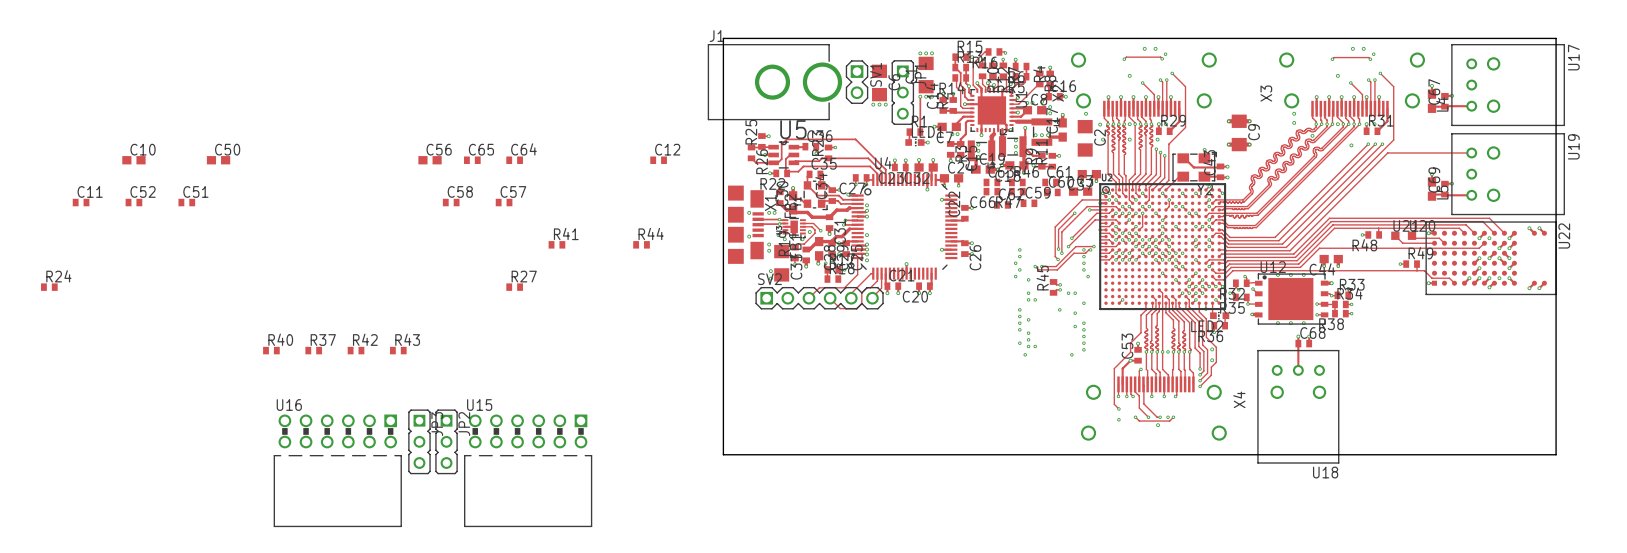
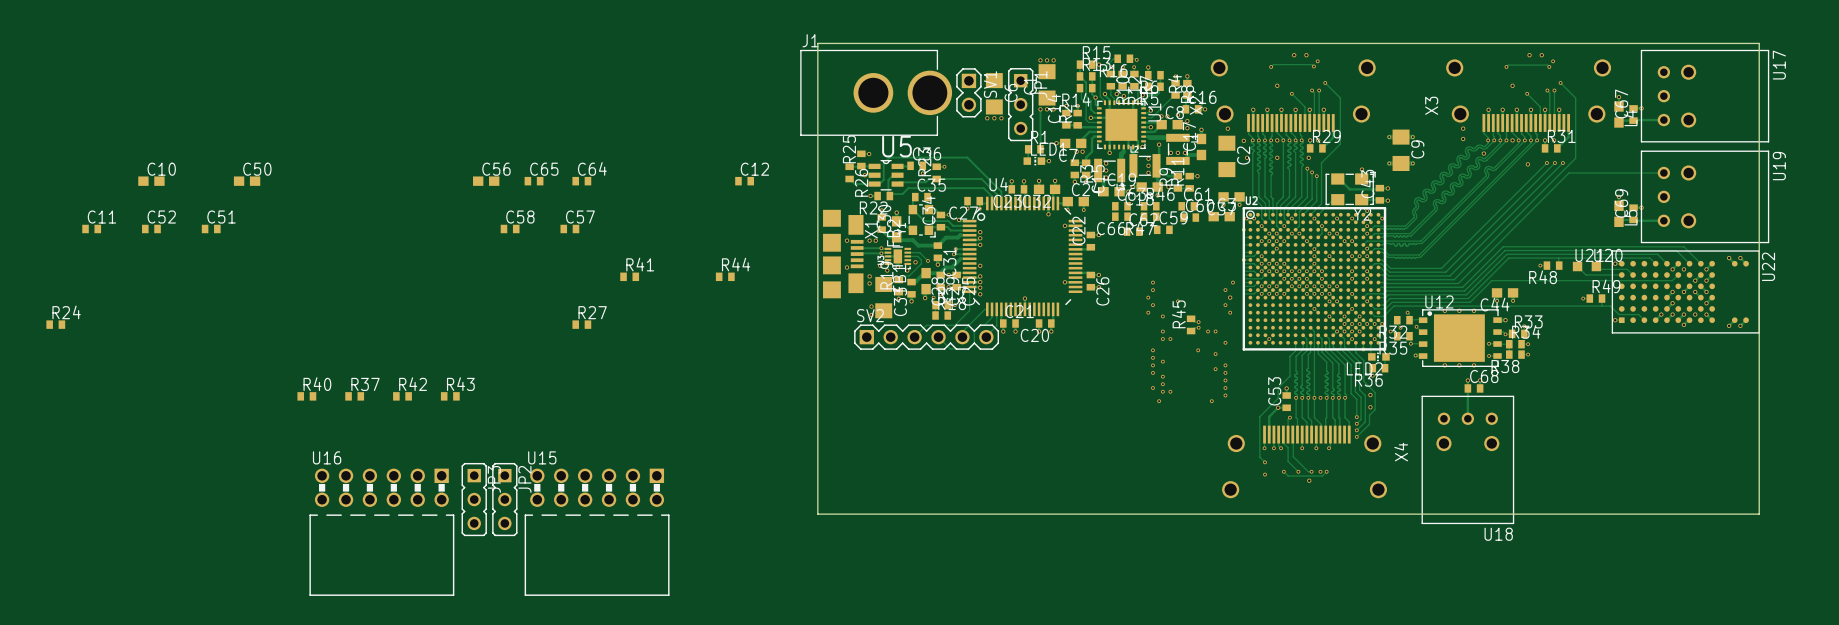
track: (1109, 199) (1082, 199) (1055, 227) (1055, 256) (1058, 259) -> none
via: (1109, 199) -> none
track: (1100, 203) (1106, 203) -> none
track: (1089, 209) (1100, 209) -> none
via: (1089, 209) -> none
track: (1112, 209) (1109, 213) (1096, 213) (1071, 238) -> none
track: (1119, 209) (1115, 206) (1087, 206) (1061, 232) (1061, 253) -> none
track: (1074, 213) (1058, 229) (1058, 249) -> none
via: (1074, 213) -> none
track: (1142, 213) (1142, 226) (1139, 229) -> none
via: (1142, 213) -> none
track: (1119, 223) (1115, 219) (1095, 219) (1068, 246) -> none
track: (1135, 226) (1132, 229) -> none
via: (1135, 226) -> none
via: (1071, 238) -> none
via: (1068, 246) -> none
track: (1093, 246) (1076, 246) (1056, 266) (1041, 266) -> none
via: (1093, 246) -> none
via: (1058, 249) -> none
via: (1083, 249) -> none
track: (1090, 249) (1085, 253) (1073, 253) (1057, 269) (1038, 269) (1035, 266) -> none
via: (1061, 253) -> none
via: (1058, 259) -> none
via: (1083, 263) -> none
via: none -> (1230, 297)
via: (1035, 266) -> none

